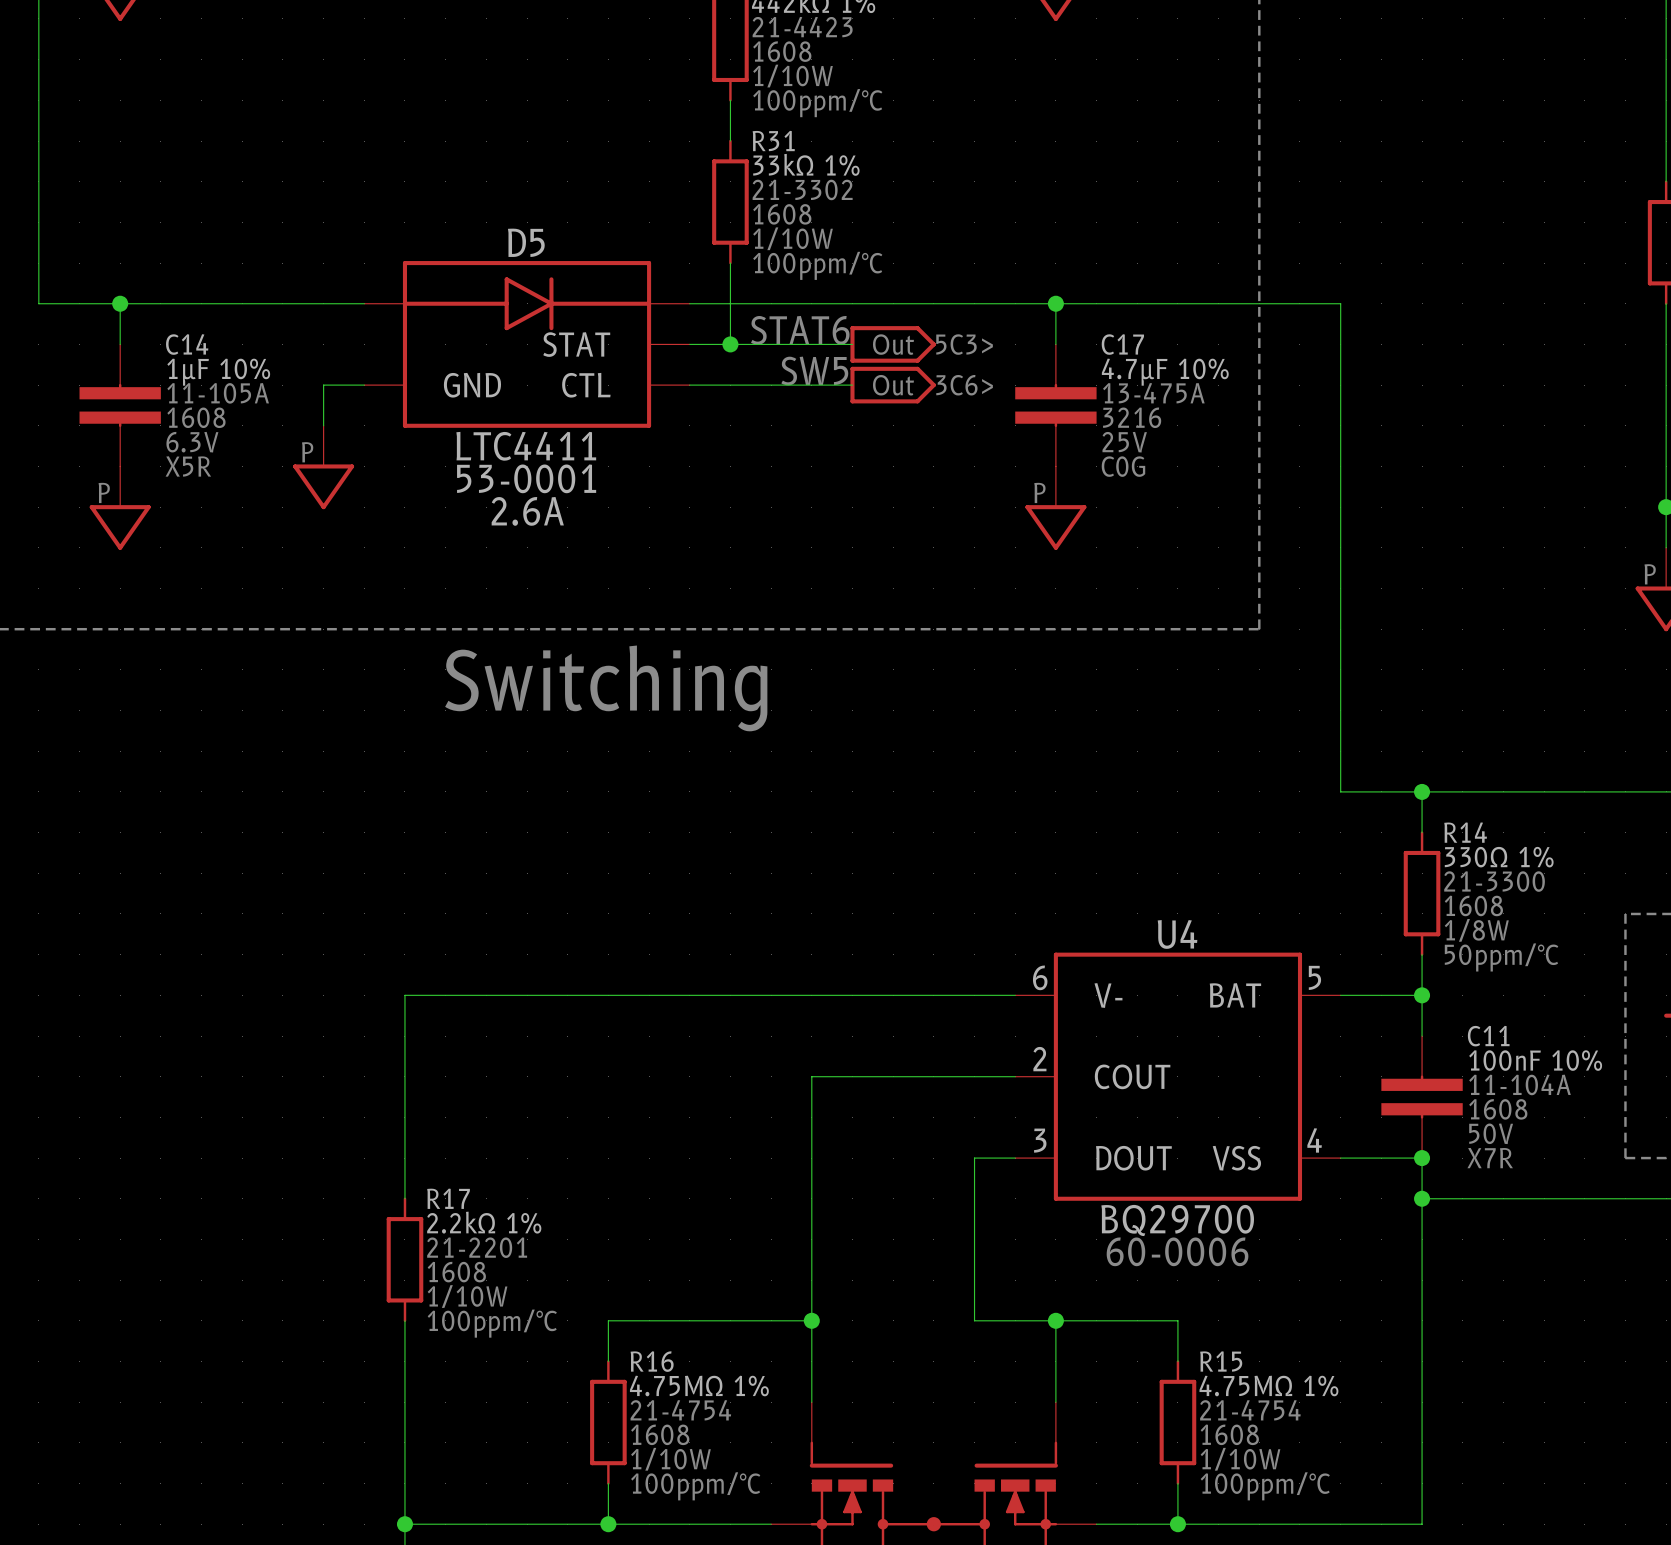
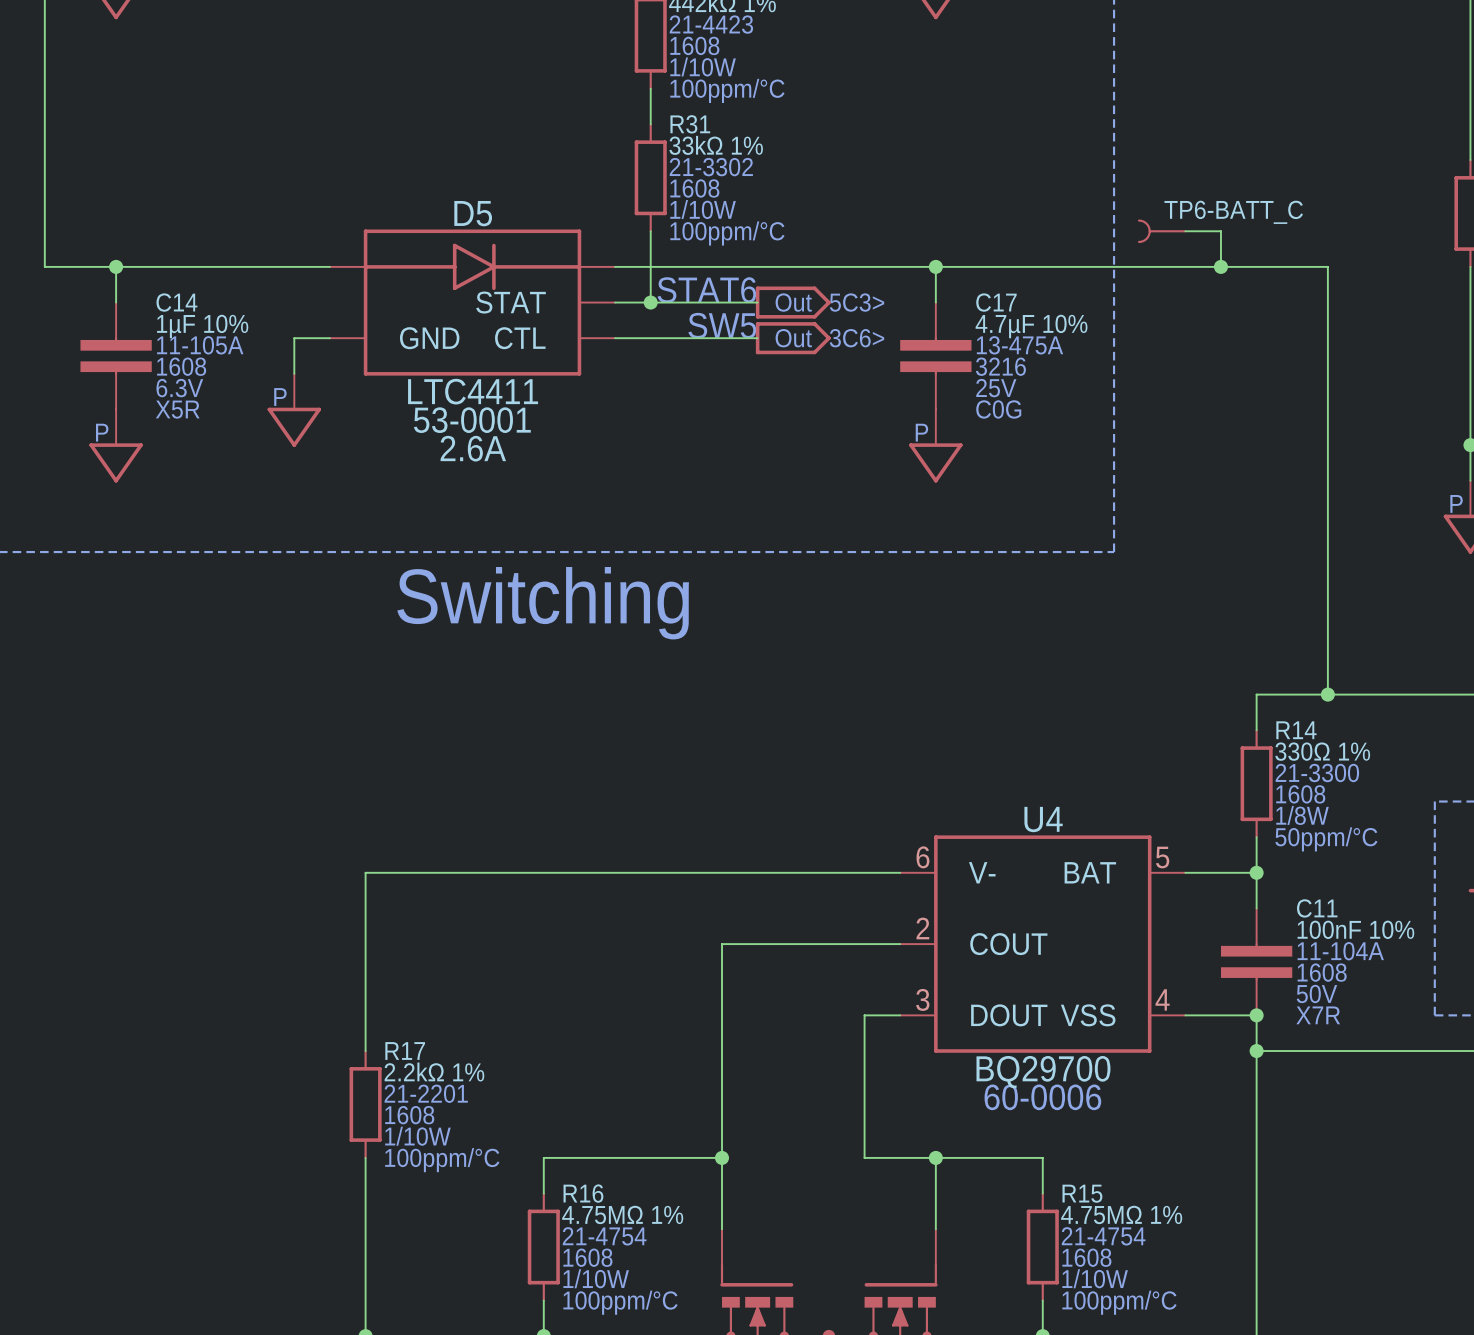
TP6-BATT_C: none -> (1162, 231)
wire: none -> (1185, 231) (1220, 231) (1220, 266)
wire: (1340, 303) (1340, 791) (1422, 791) -> (1185, 266) (1327, 266) (1327, 694)
junction: none -> (1220, 266)
junction position: (1422, 791) -> (1327, 694)

